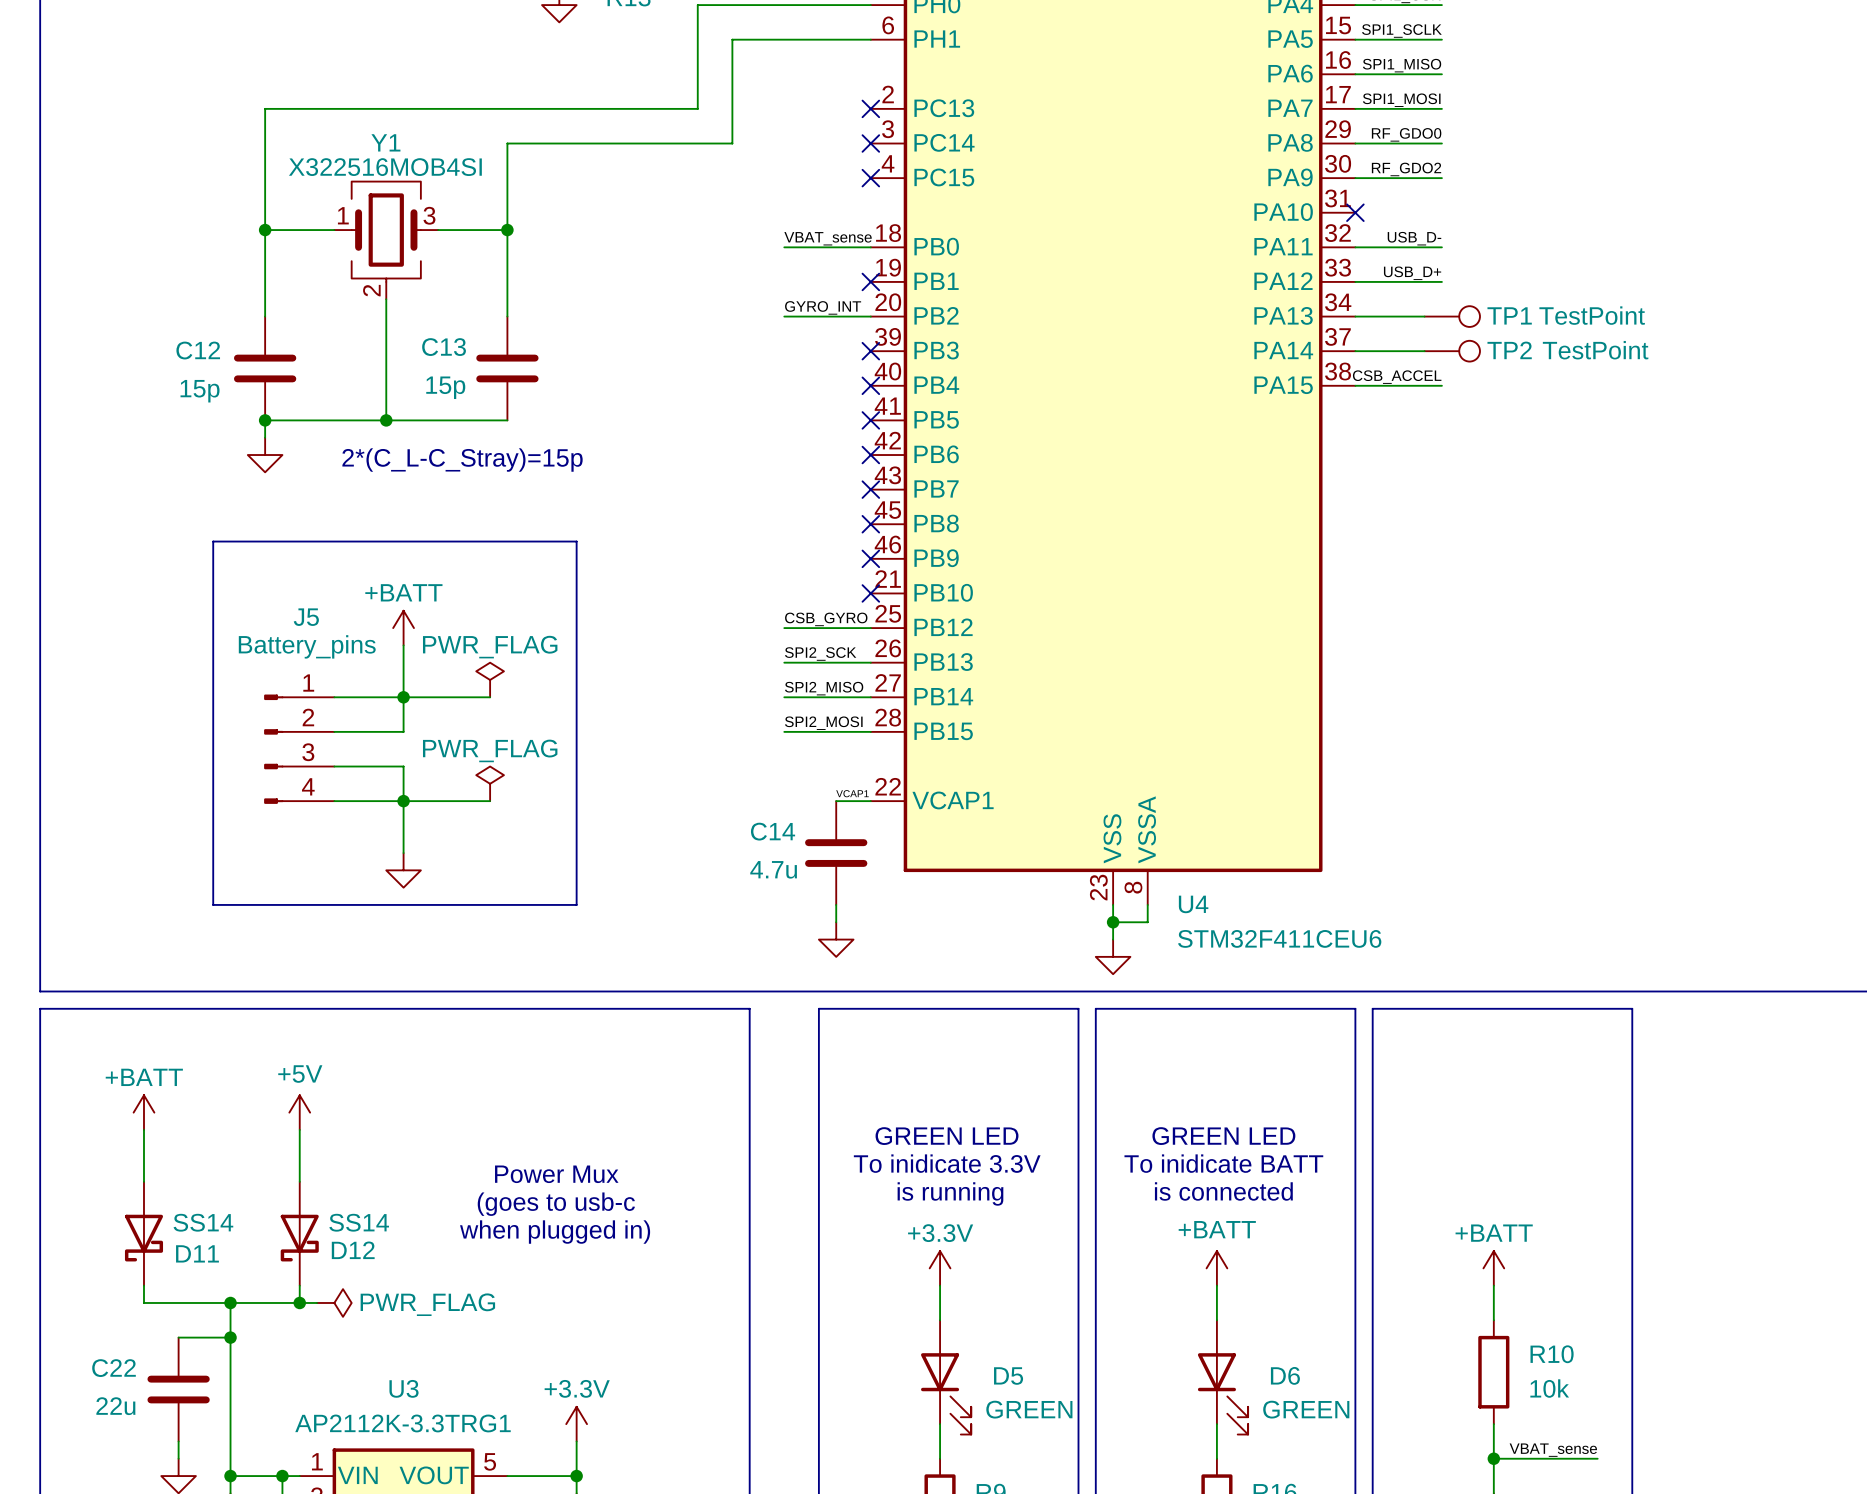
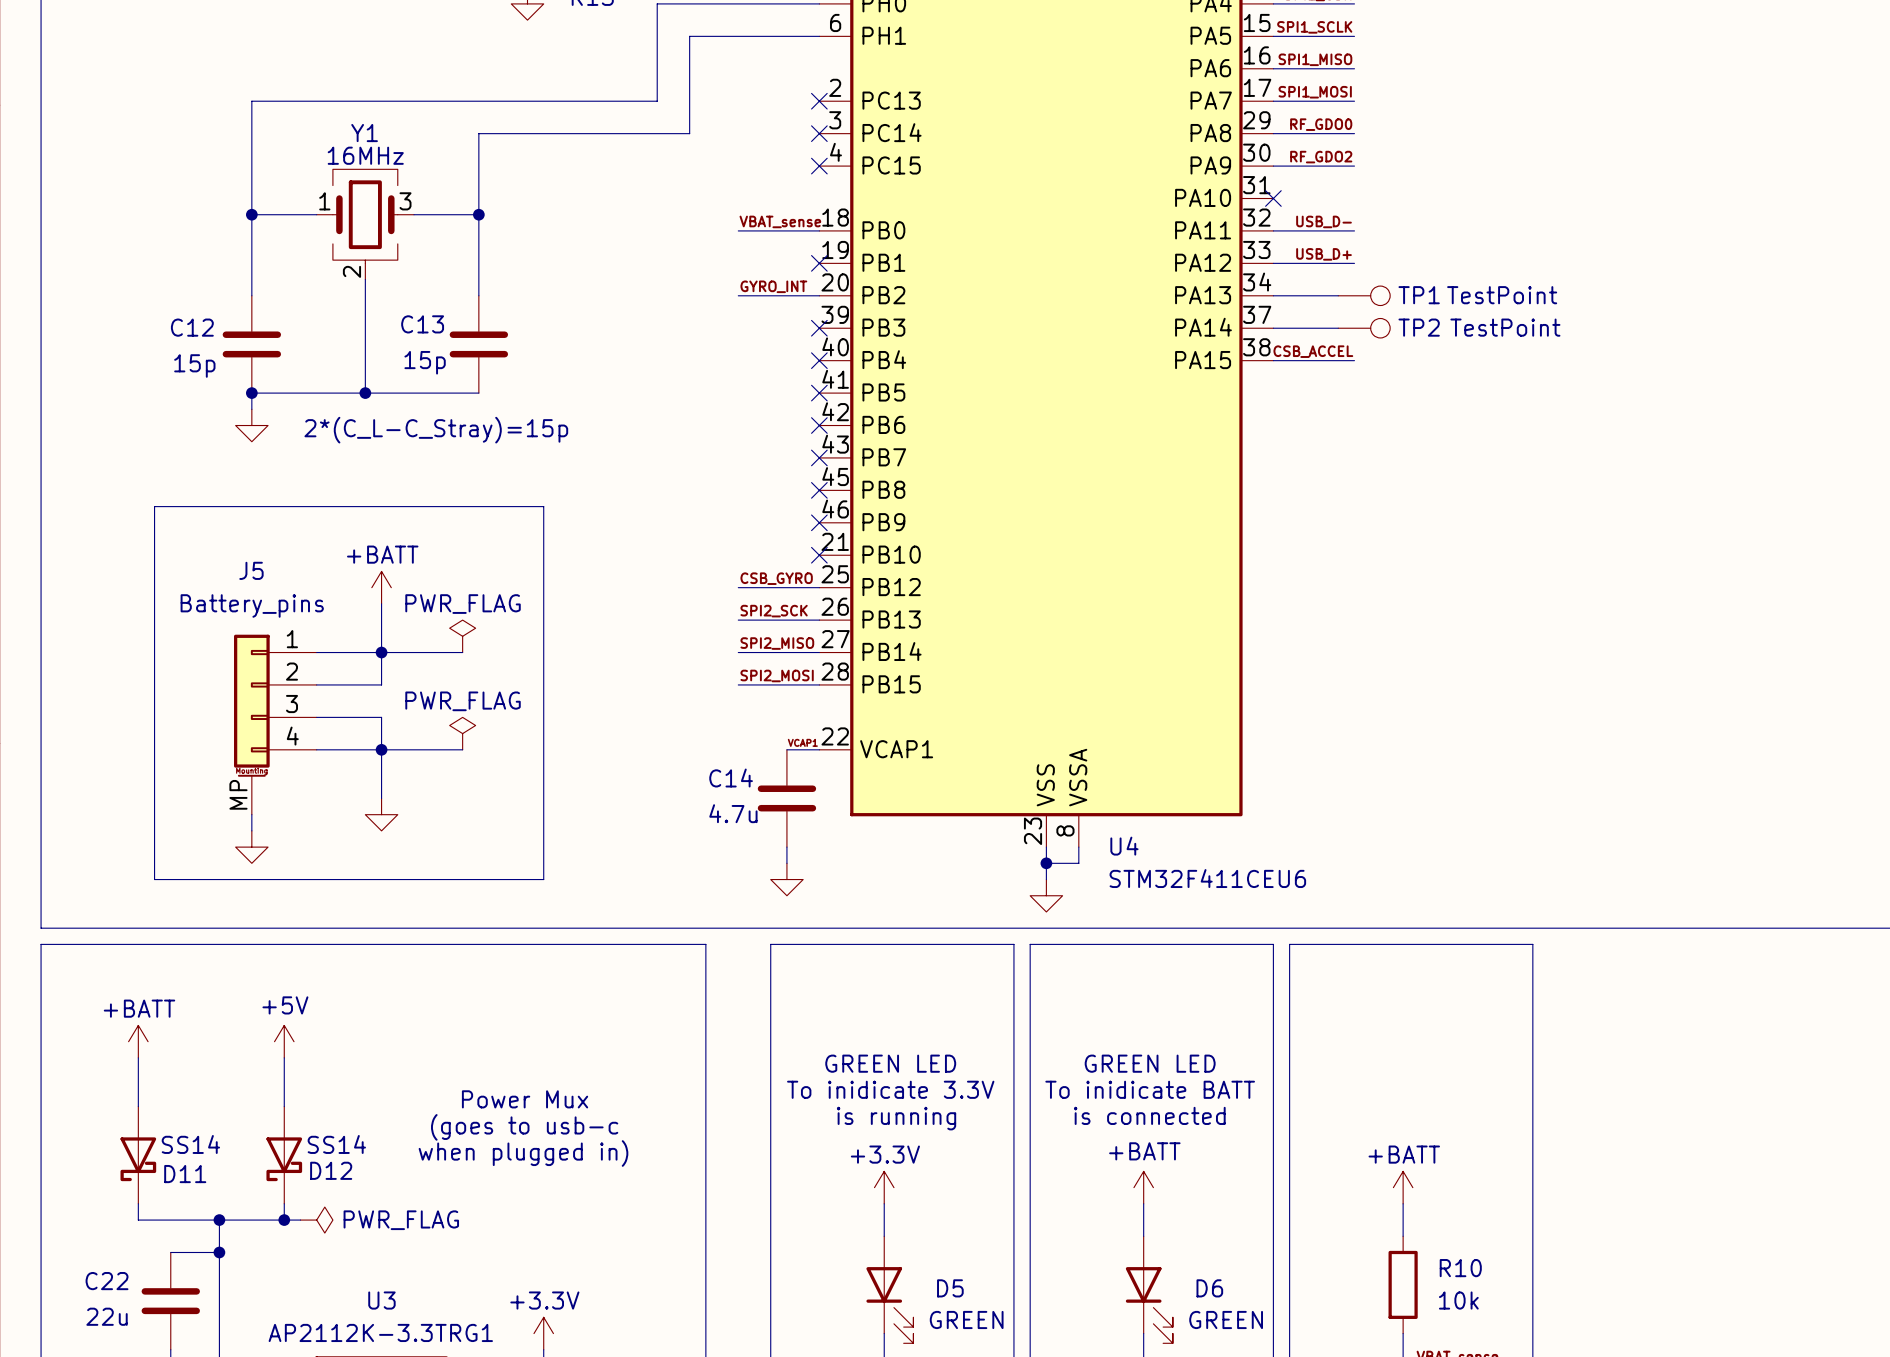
Y1 value: X322516MOB4SI (385, 167) -> 16MHz (365, 155)
line: (213, 541) (213, 904) (576, 904) -> (203, 506) (154, 506) (154, 879) (543, 879) (543, 847)
J5 name position: J5 (306, 617) -> J5 (251, 570)
J5 value position: Battery_pins (307, 646) -> Battery_pins (252, 605)
J5 symbol: [264, 694, 335, 804] -> [234, 634, 317, 815]
wire: none -> (251, 814) (251, 830)
power symbol: none -> (251, 847)

